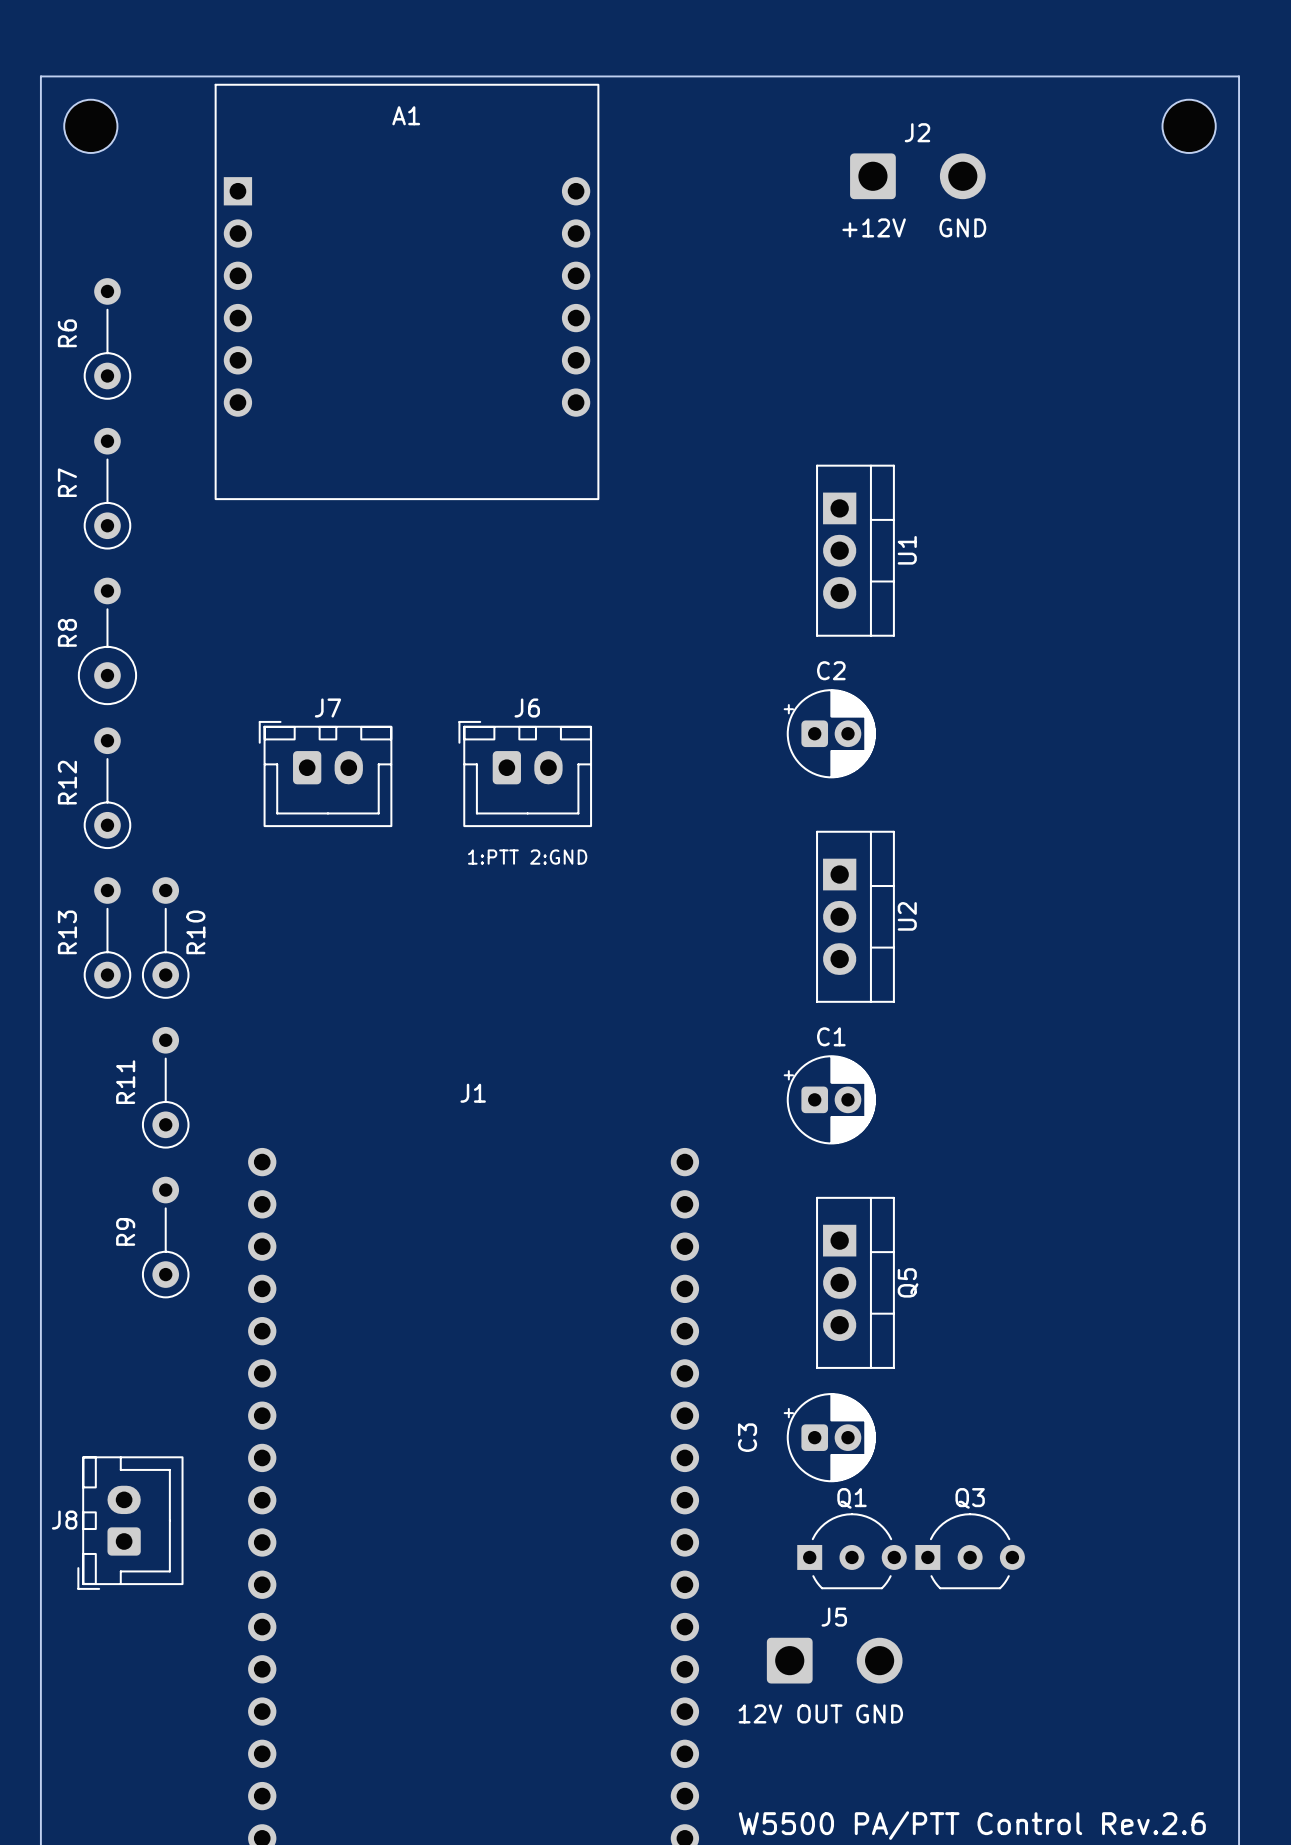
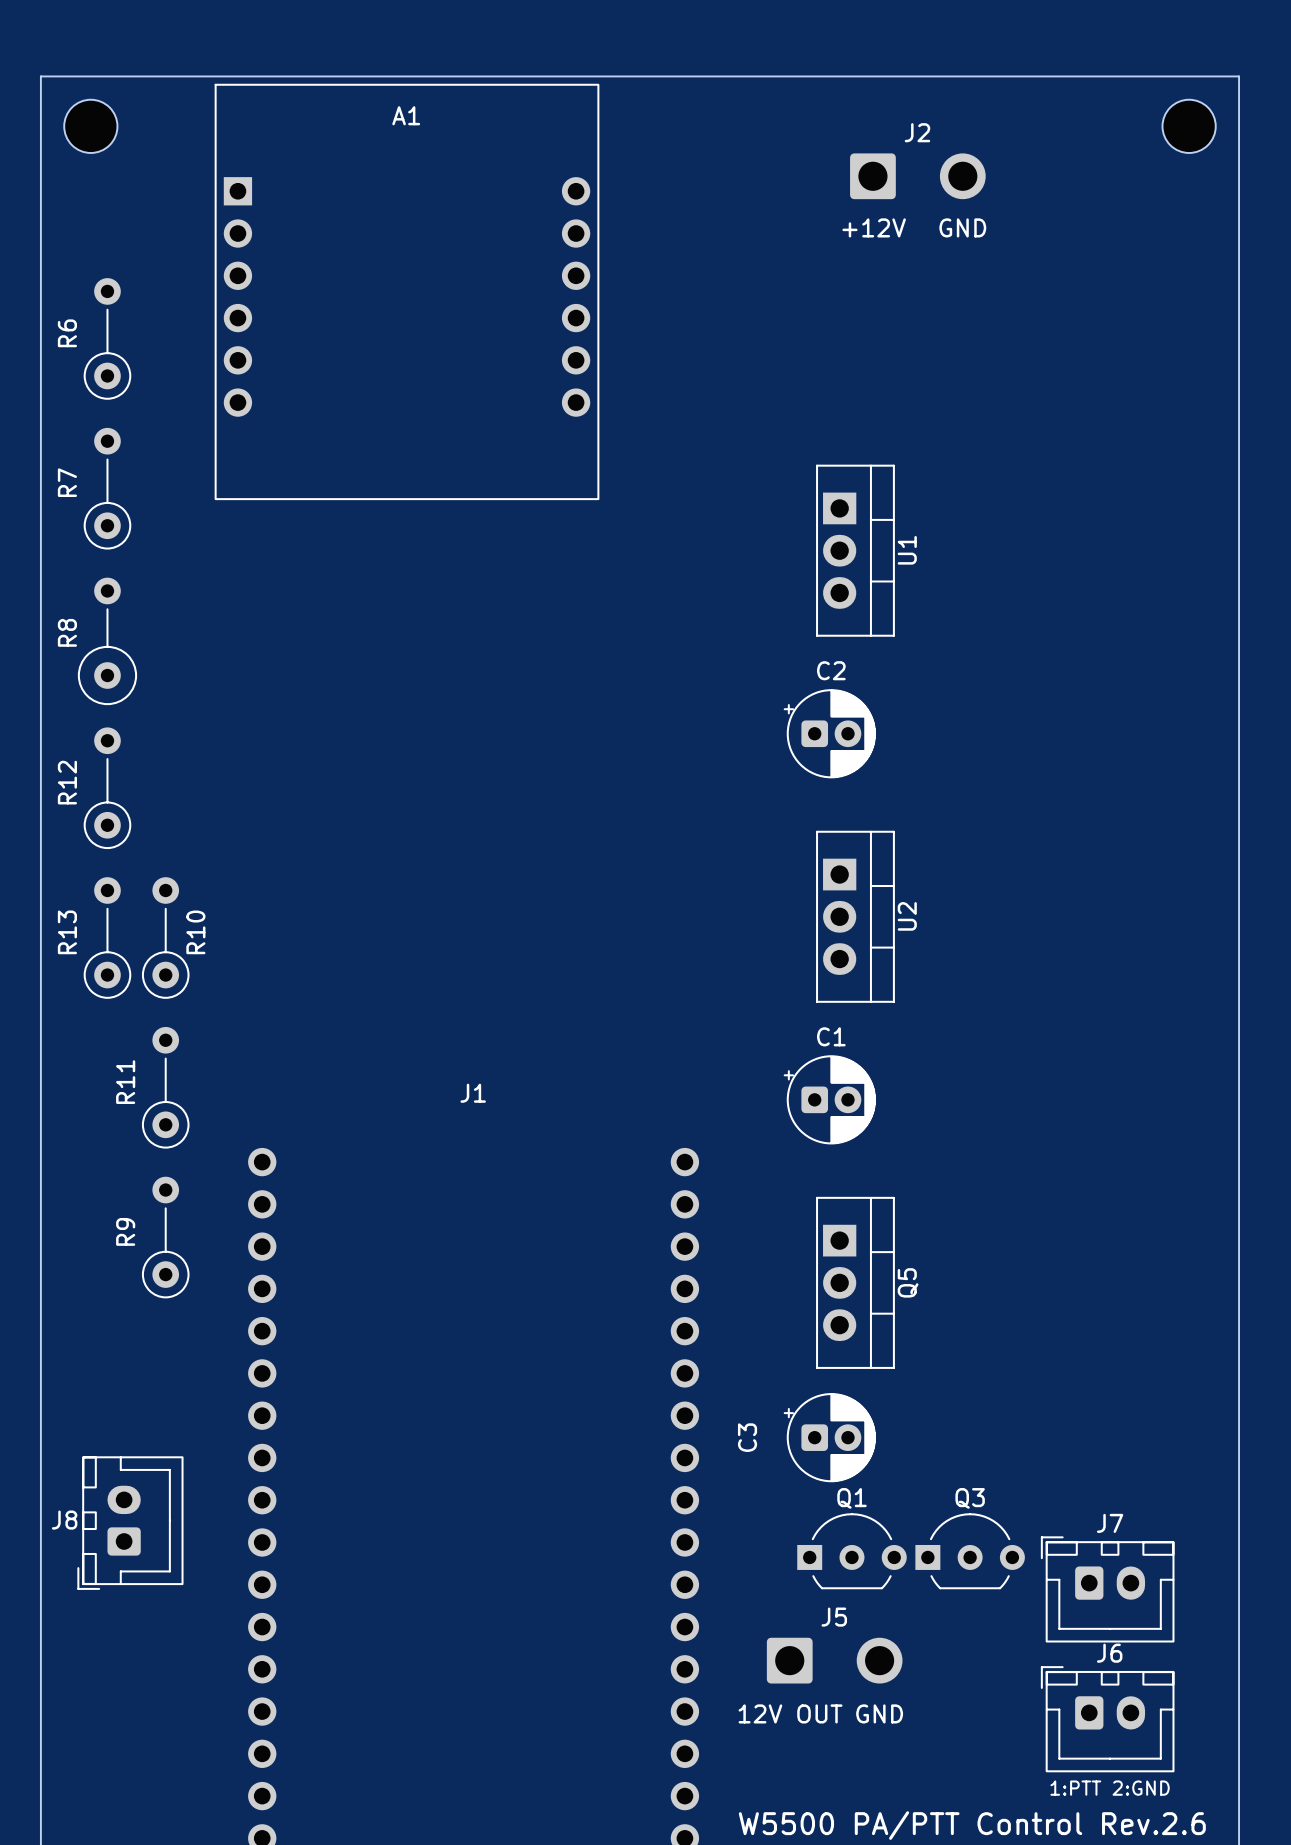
J7 position: (325, 774) -> (1107, 1589)
J6 position: (525, 774) -> (1107, 1719)
text: 1:PTT 2:GND (527, 857) -> none
text: none -> 1:PTT 2:GND (1110, 1788)

